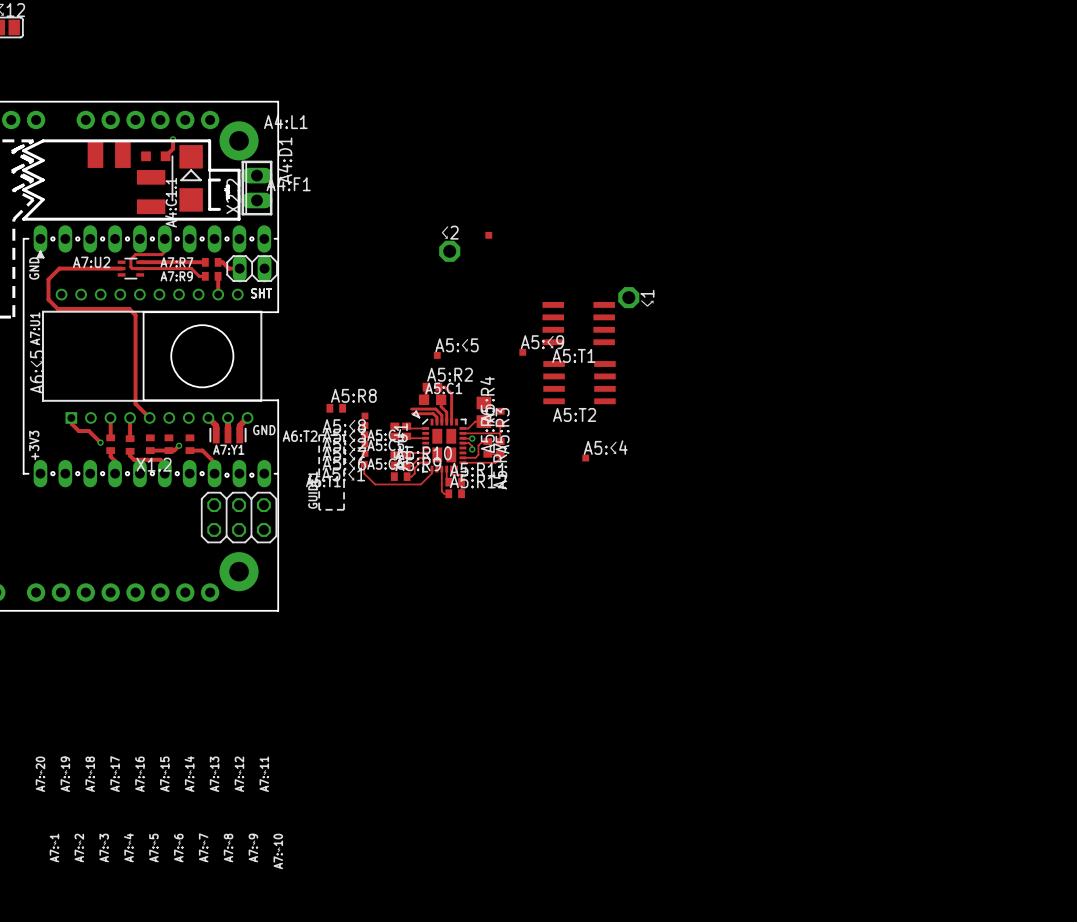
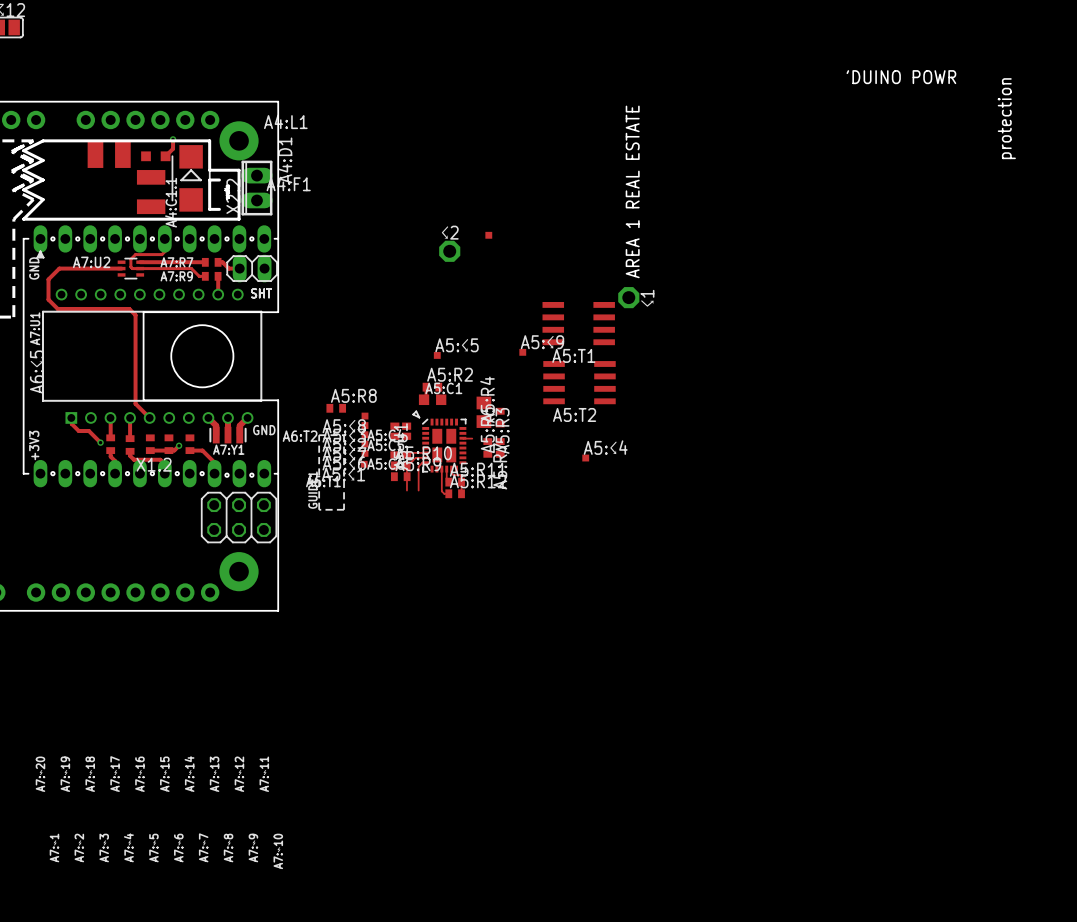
text: none -> 'DUINO POWR (901, 77)
text: none -> protection (1006, 118)
text: none -> AREA 1 REAL ESTATE (632, 191)
track: (438, 387) (444, 387) (451, 393) (451, 422) -> none
track: (441, 399) (441, 406) (446, 412) (446, 422) -> none
track: (411, 409) (435, 409) (441, 415) (441, 422) -> none
track: (412, 413) (433, 413) (436, 417) (436, 422) -> none
track: (483, 421) (475, 421) (468, 428) (462, 428) -> none
track: (500, 423) (500, 441) -> none
track: (406, 426) (408, 428) (425, 428) -> none
track: (462, 433) (500, 433) -> none
track: (406, 436) (406, 438) (425, 438) -> none
via: (472, 438) -> none
track: (487, 441) (481, 442) (478, 445) (478, 454) (475, 457) (462, 457) -> none
track: (462, 443) (469, 443) (472, 449) -> none
via: (472, 449) -> none
track: (487, 454) (500, 454) (500, 458) (495, 462) (462, 462) -> none
track: (419, 457) (411, 465) (407, 465) -> (419, 457) (415, 457) (406, 466) (406, 490)
track: (422, 462) (414, 468) (414, 473) (411, 476) (407, 476) -> (422, 462) (418, 466) (418, 490)
track: (364, 464) (364, 473) (375, 484) (420, 484) (431, 473) (432, 469) -> none

